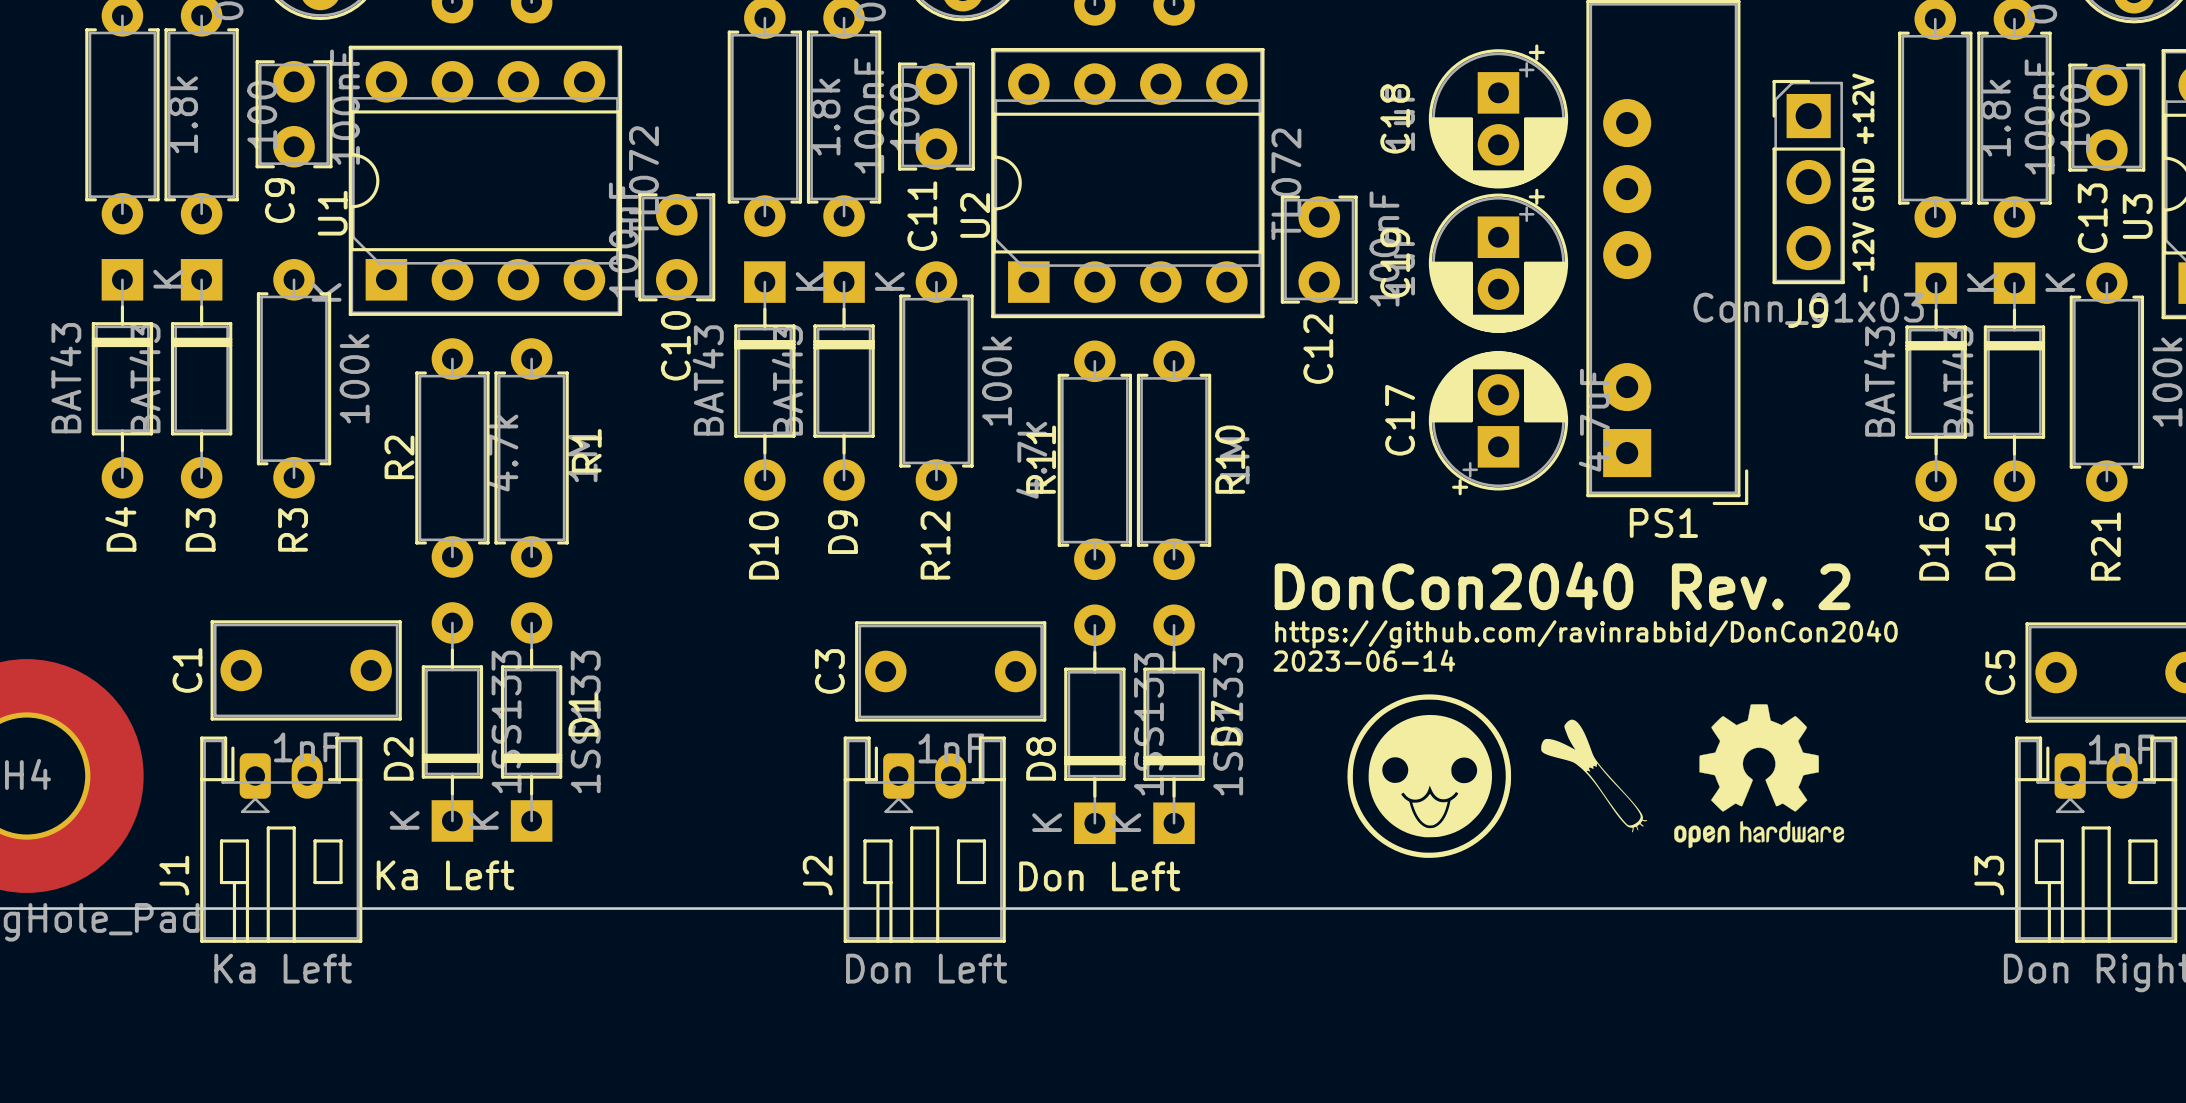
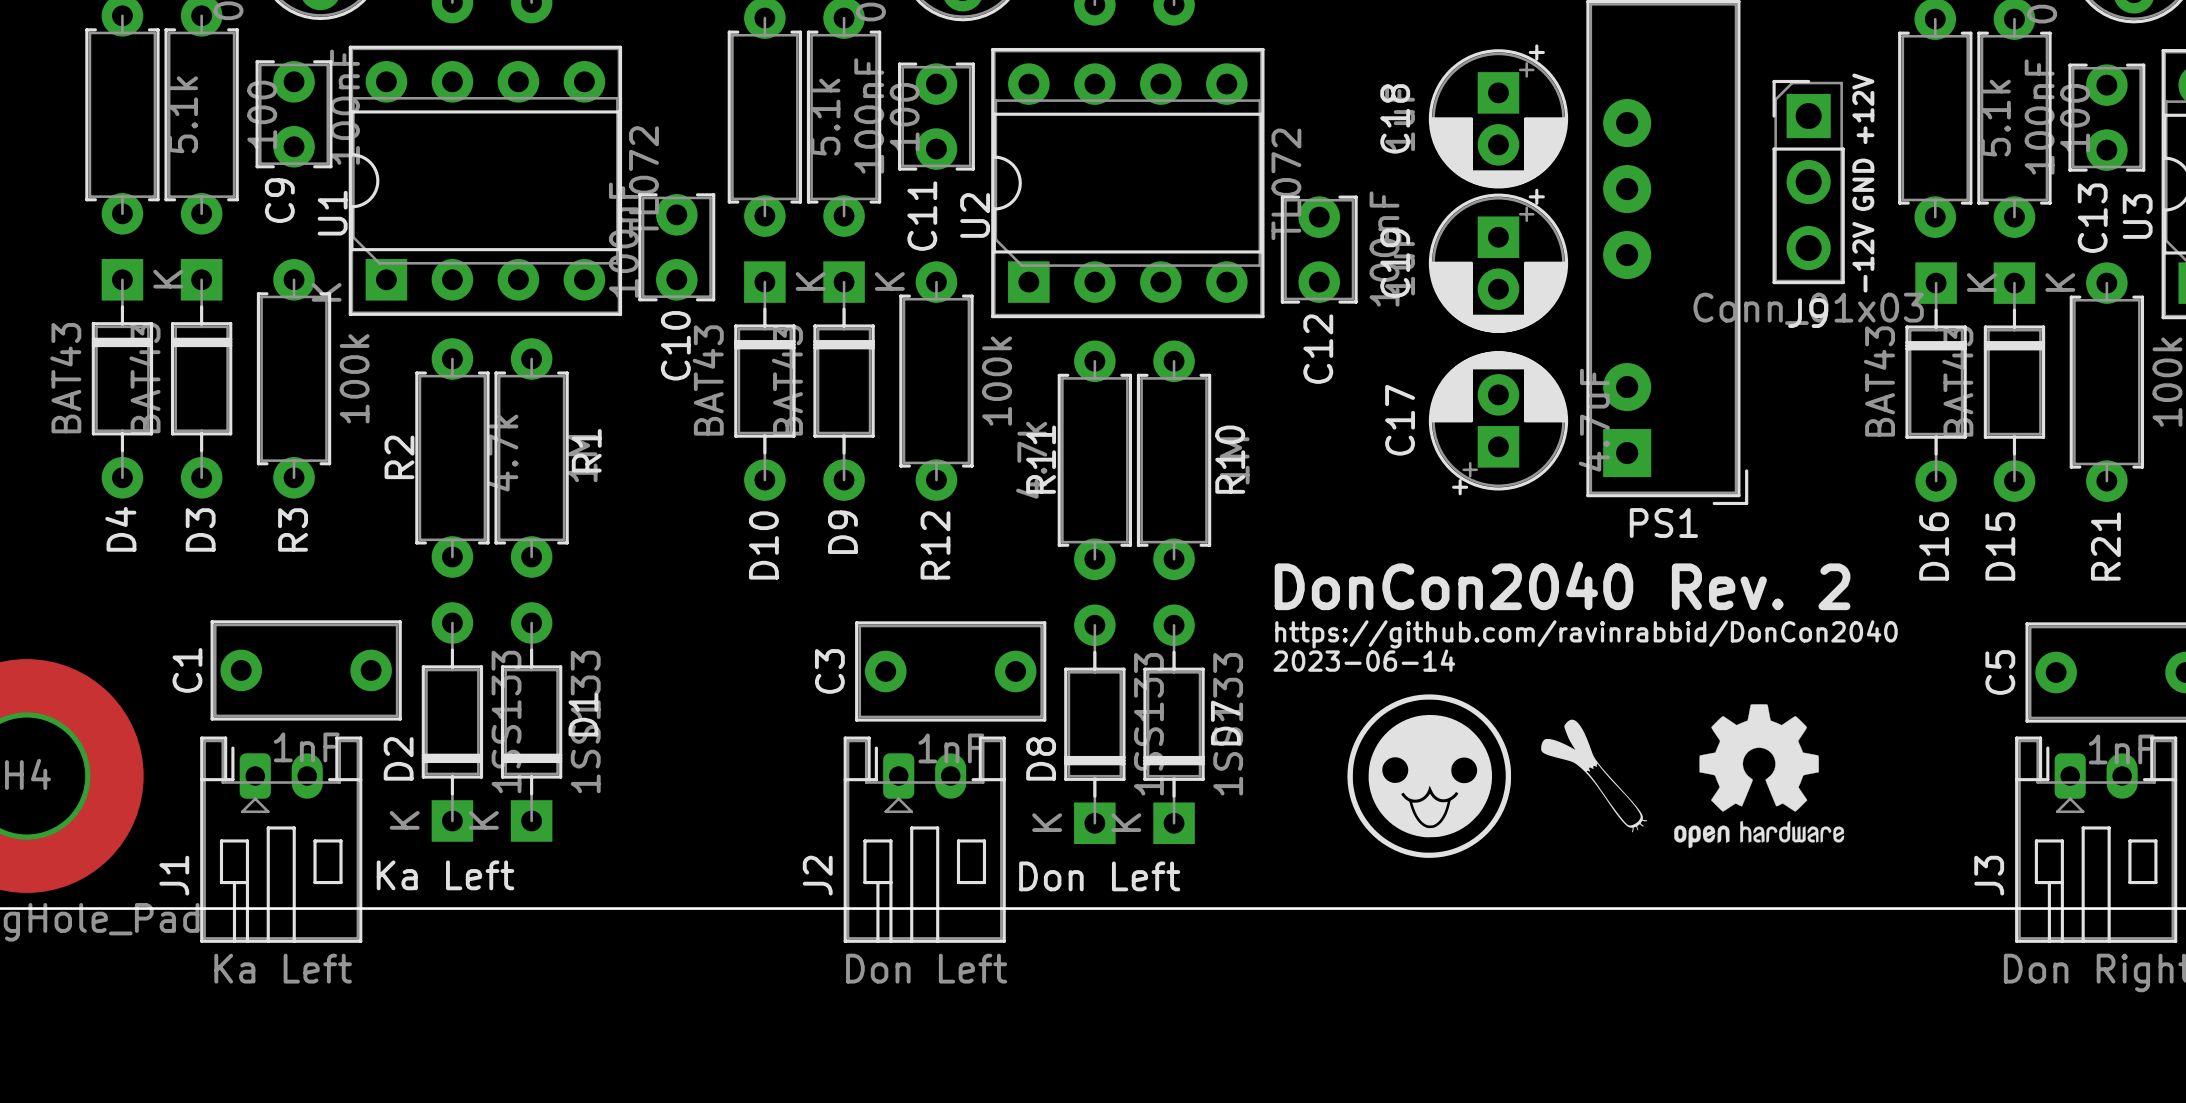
part value: 1.8k (183, 114) -> 5.1k (183, 114)
part value: 1.8k (825, 117) -> 5.1k (825, 117)
part value: 1.8k (1995, 118) -> 5.1k (1995, 118)

